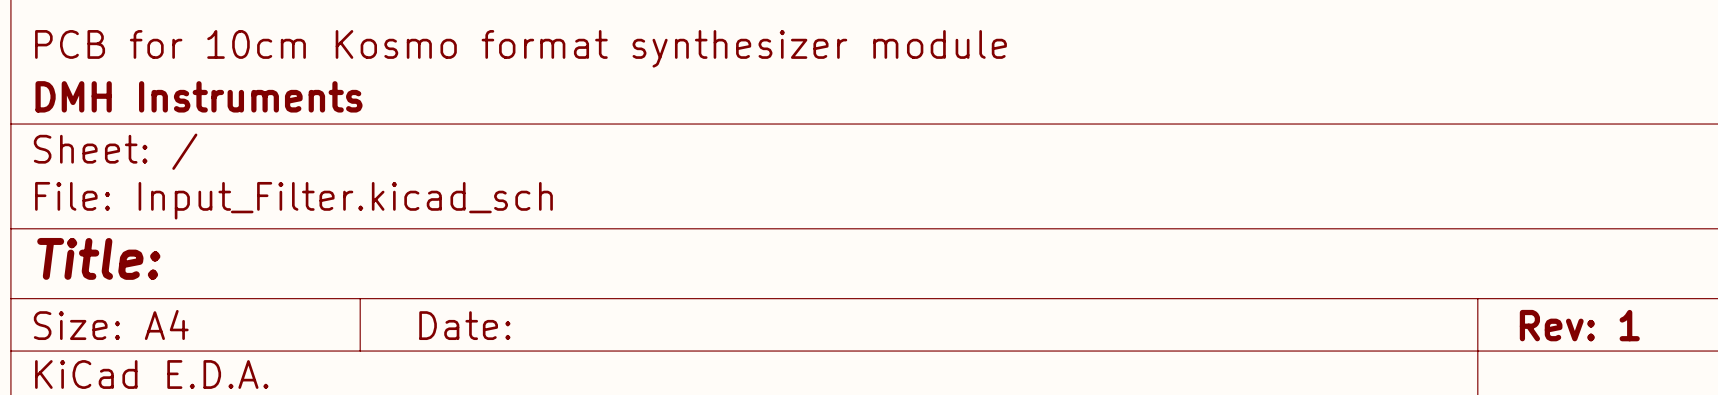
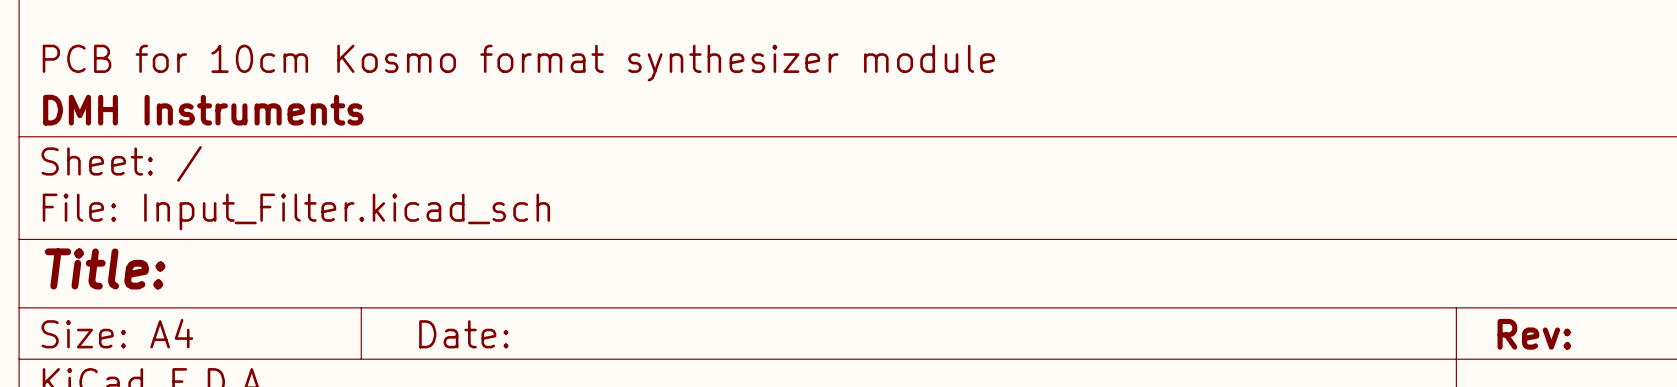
title block: Rev: 1 (1579, 325) -> Rev: (1534, 334)

